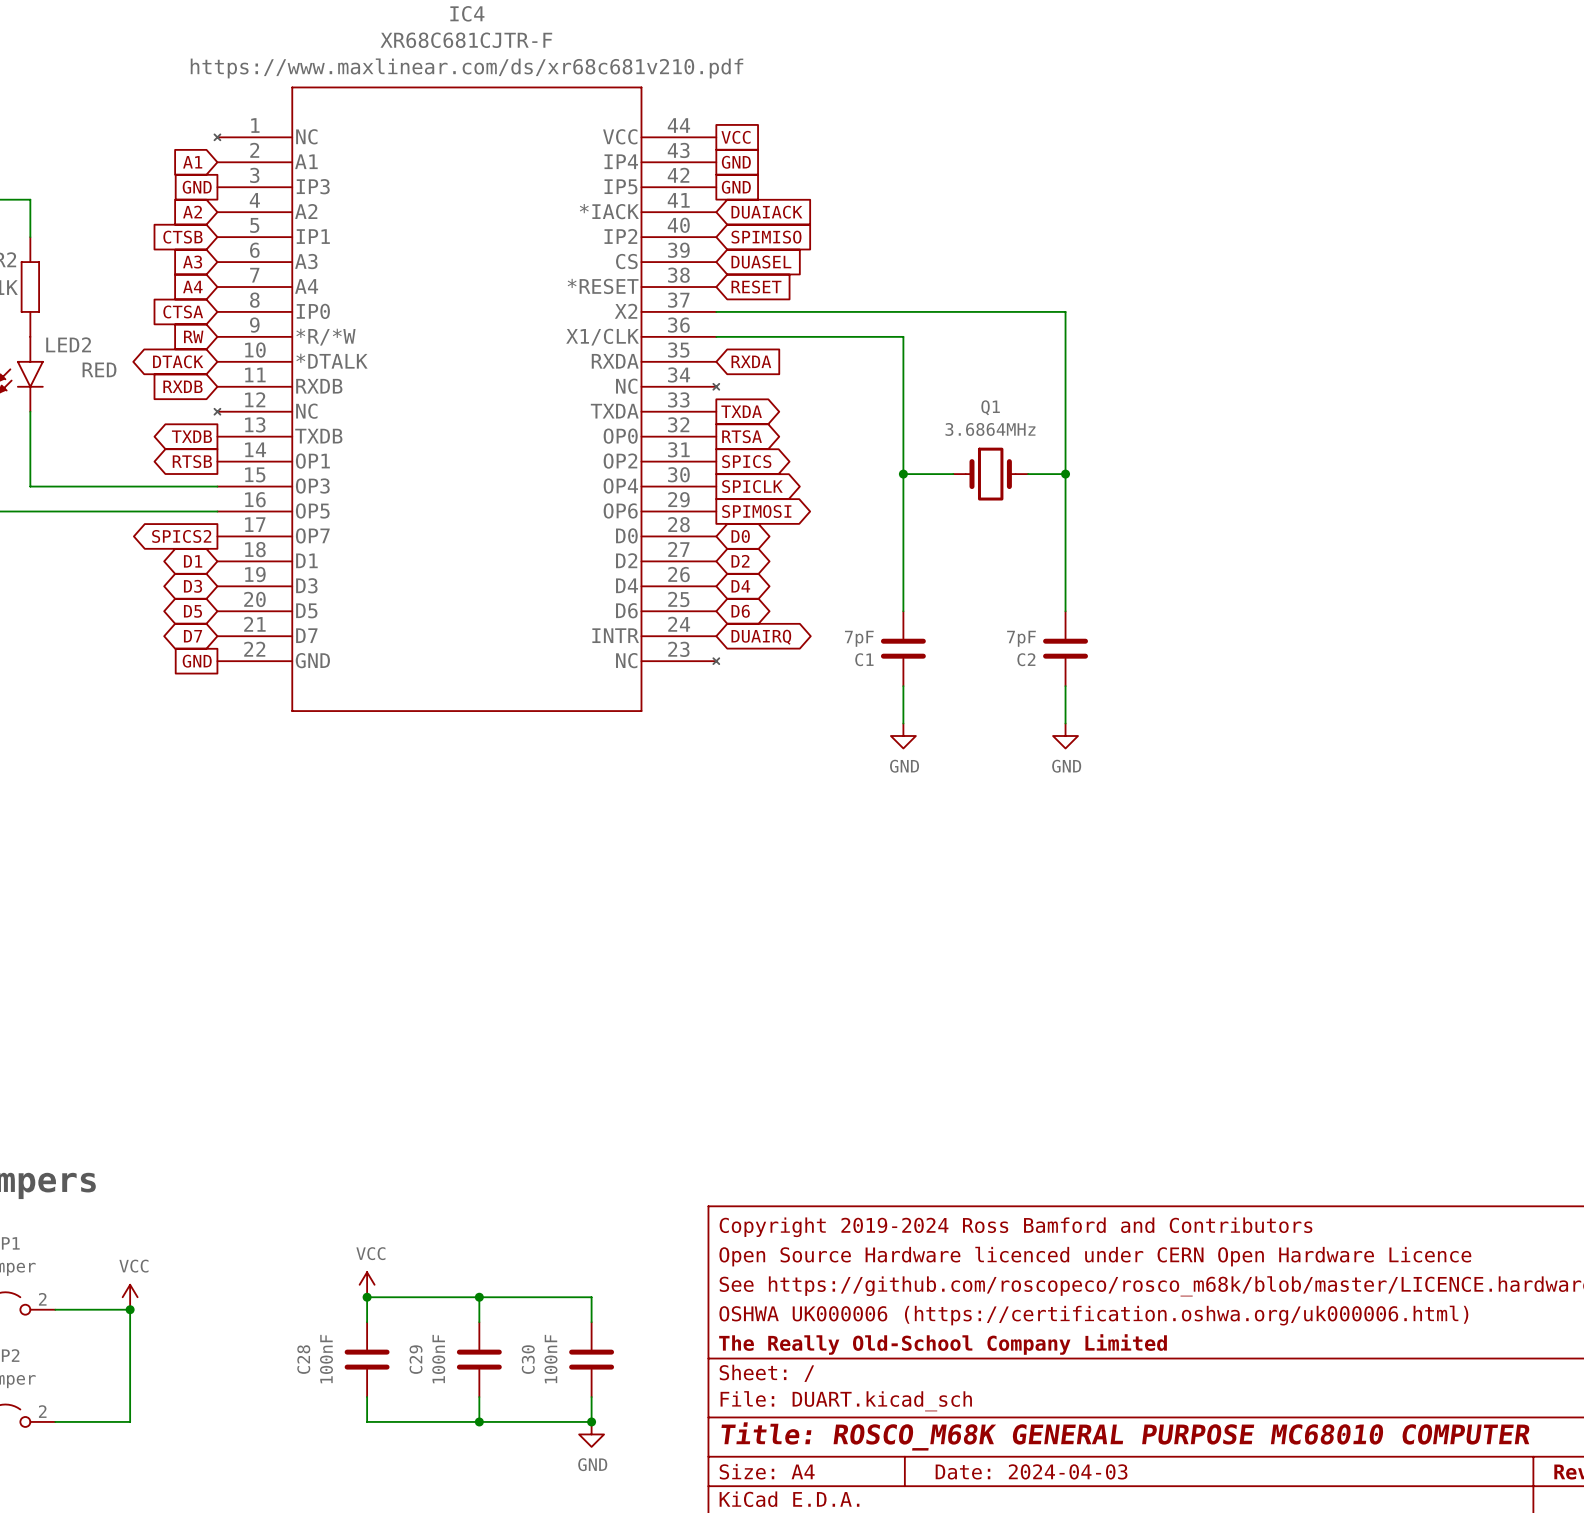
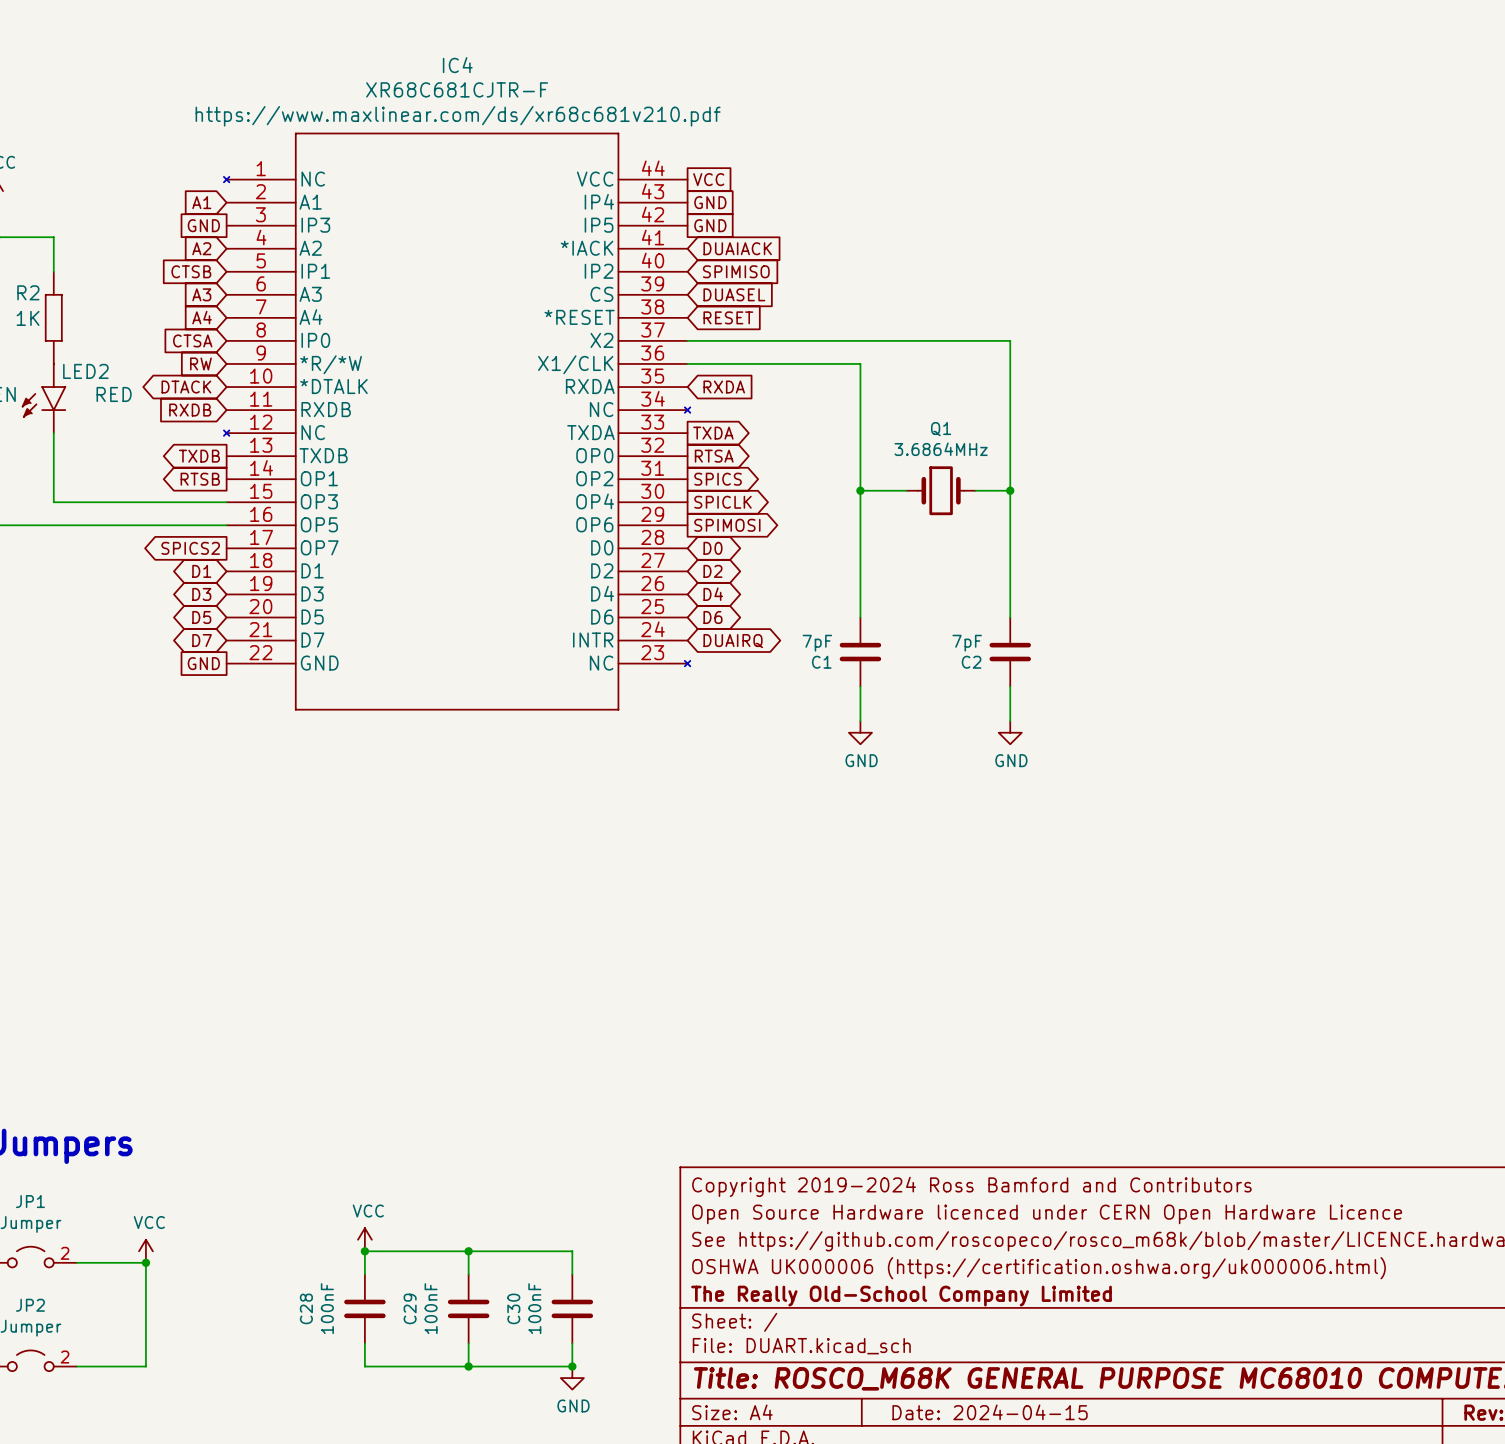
title block: Date: 2024-04-03 (1031, 1471) -> Date: 2024-04-15 (990, 1412)

